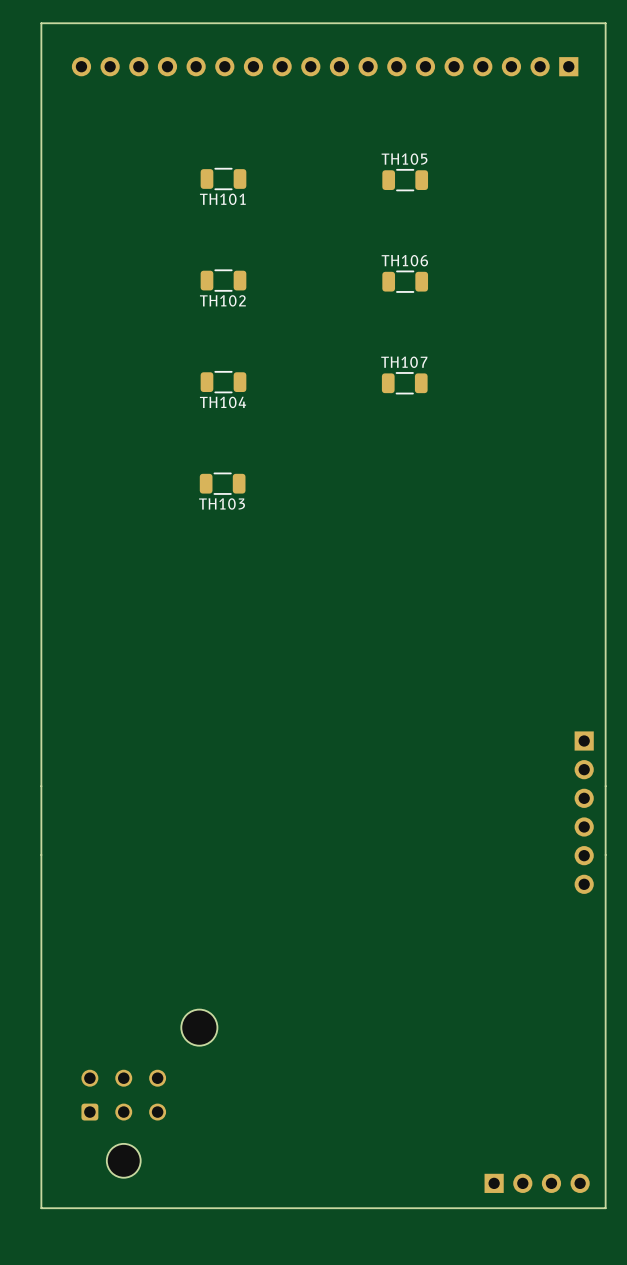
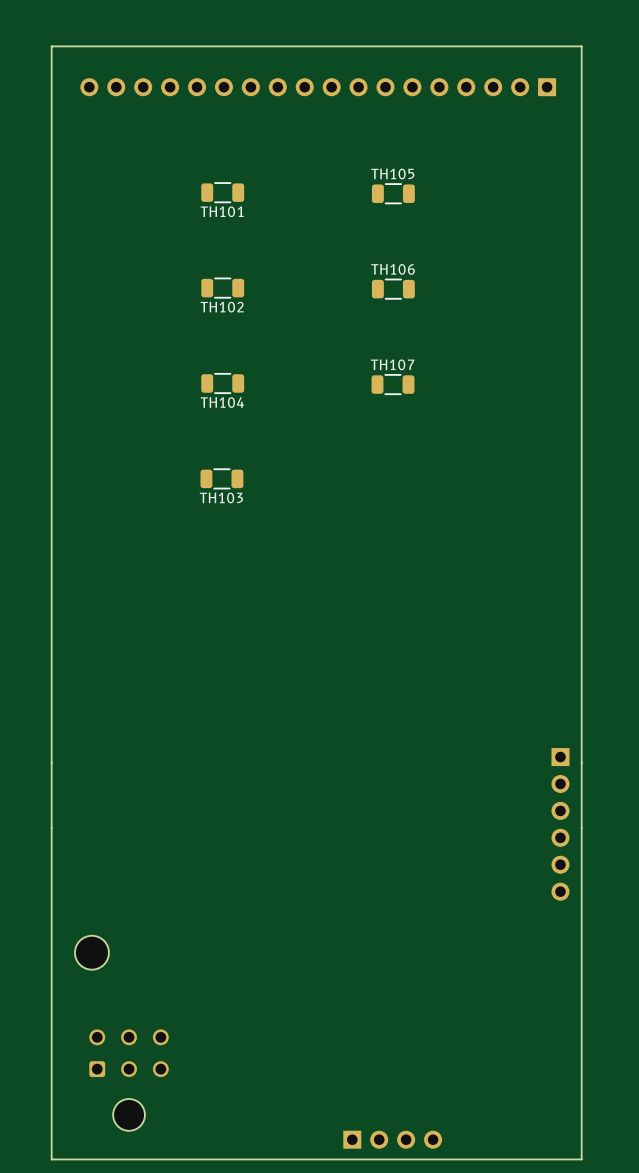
part position: (584, 812) -> (560, 824)
part position: (199, 1027) -> (91, 952)
part position: (537, 1183) -> (392, 1139)

